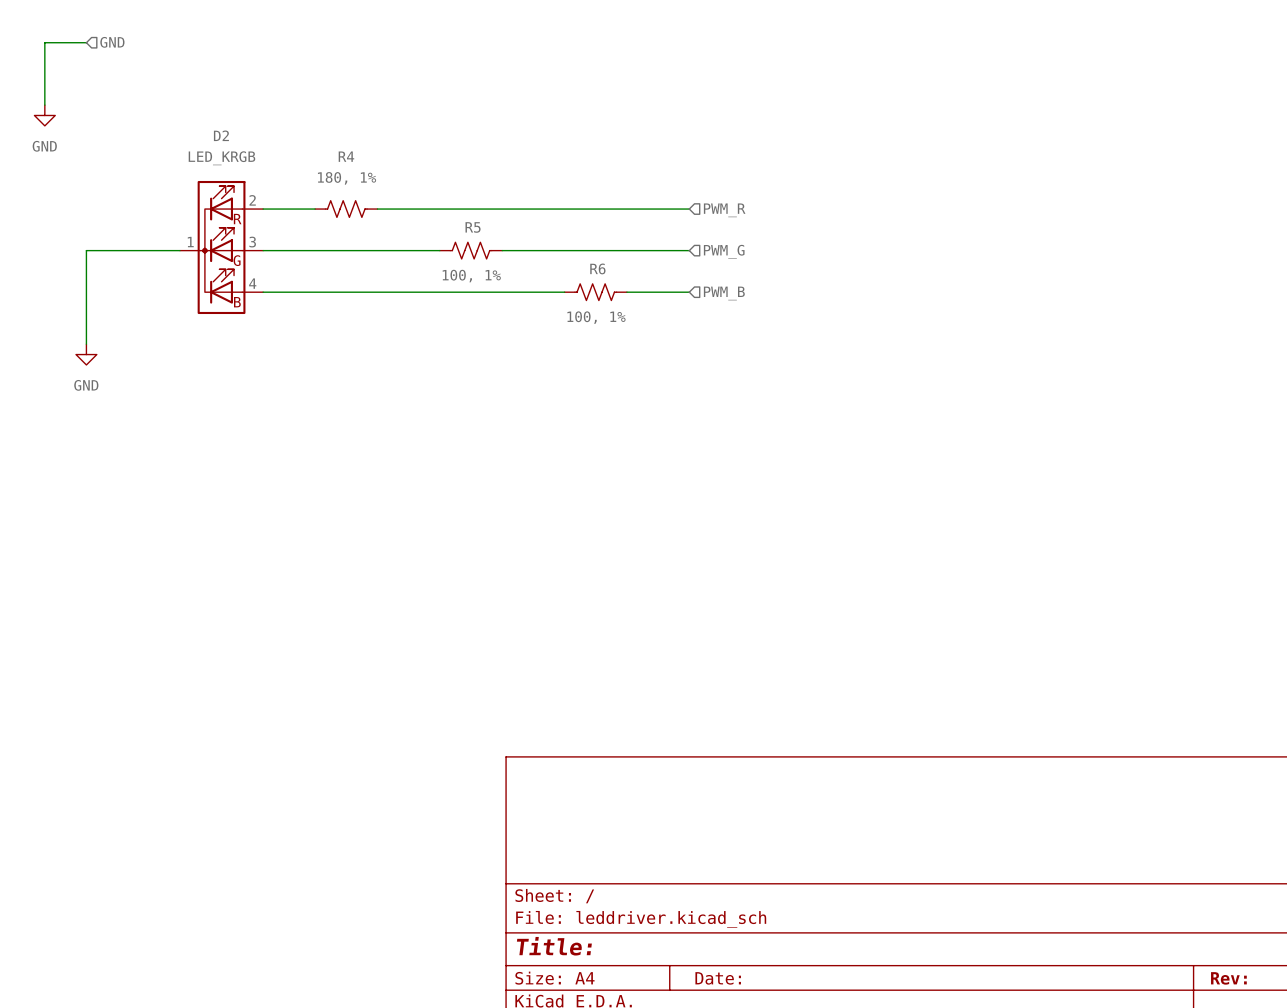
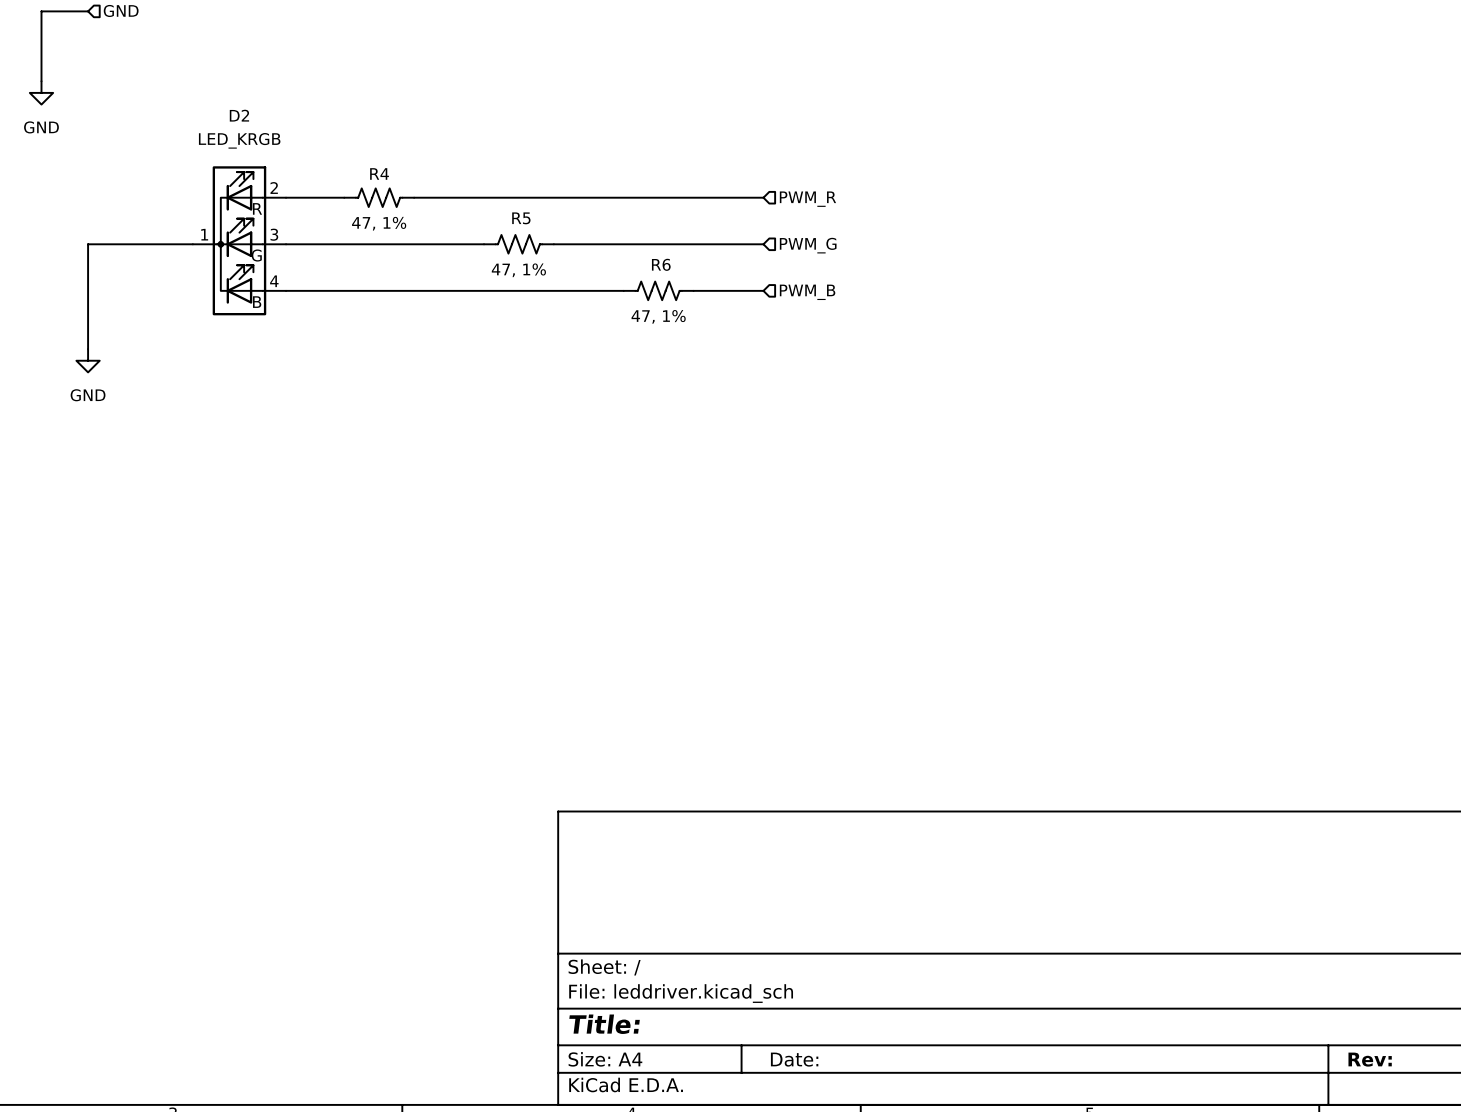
R4 name position: R4 (346, 156) -> R4 (379, 173)
R4 value: 180, 1% (347, 178) -> 47, 1% (379, 223)
R5 value: 100, 1% (471, 276) -> 47, 1% (518, 270)
R6 value: 100, 1% (596, 317) -> 47, 1% (658, 316)

